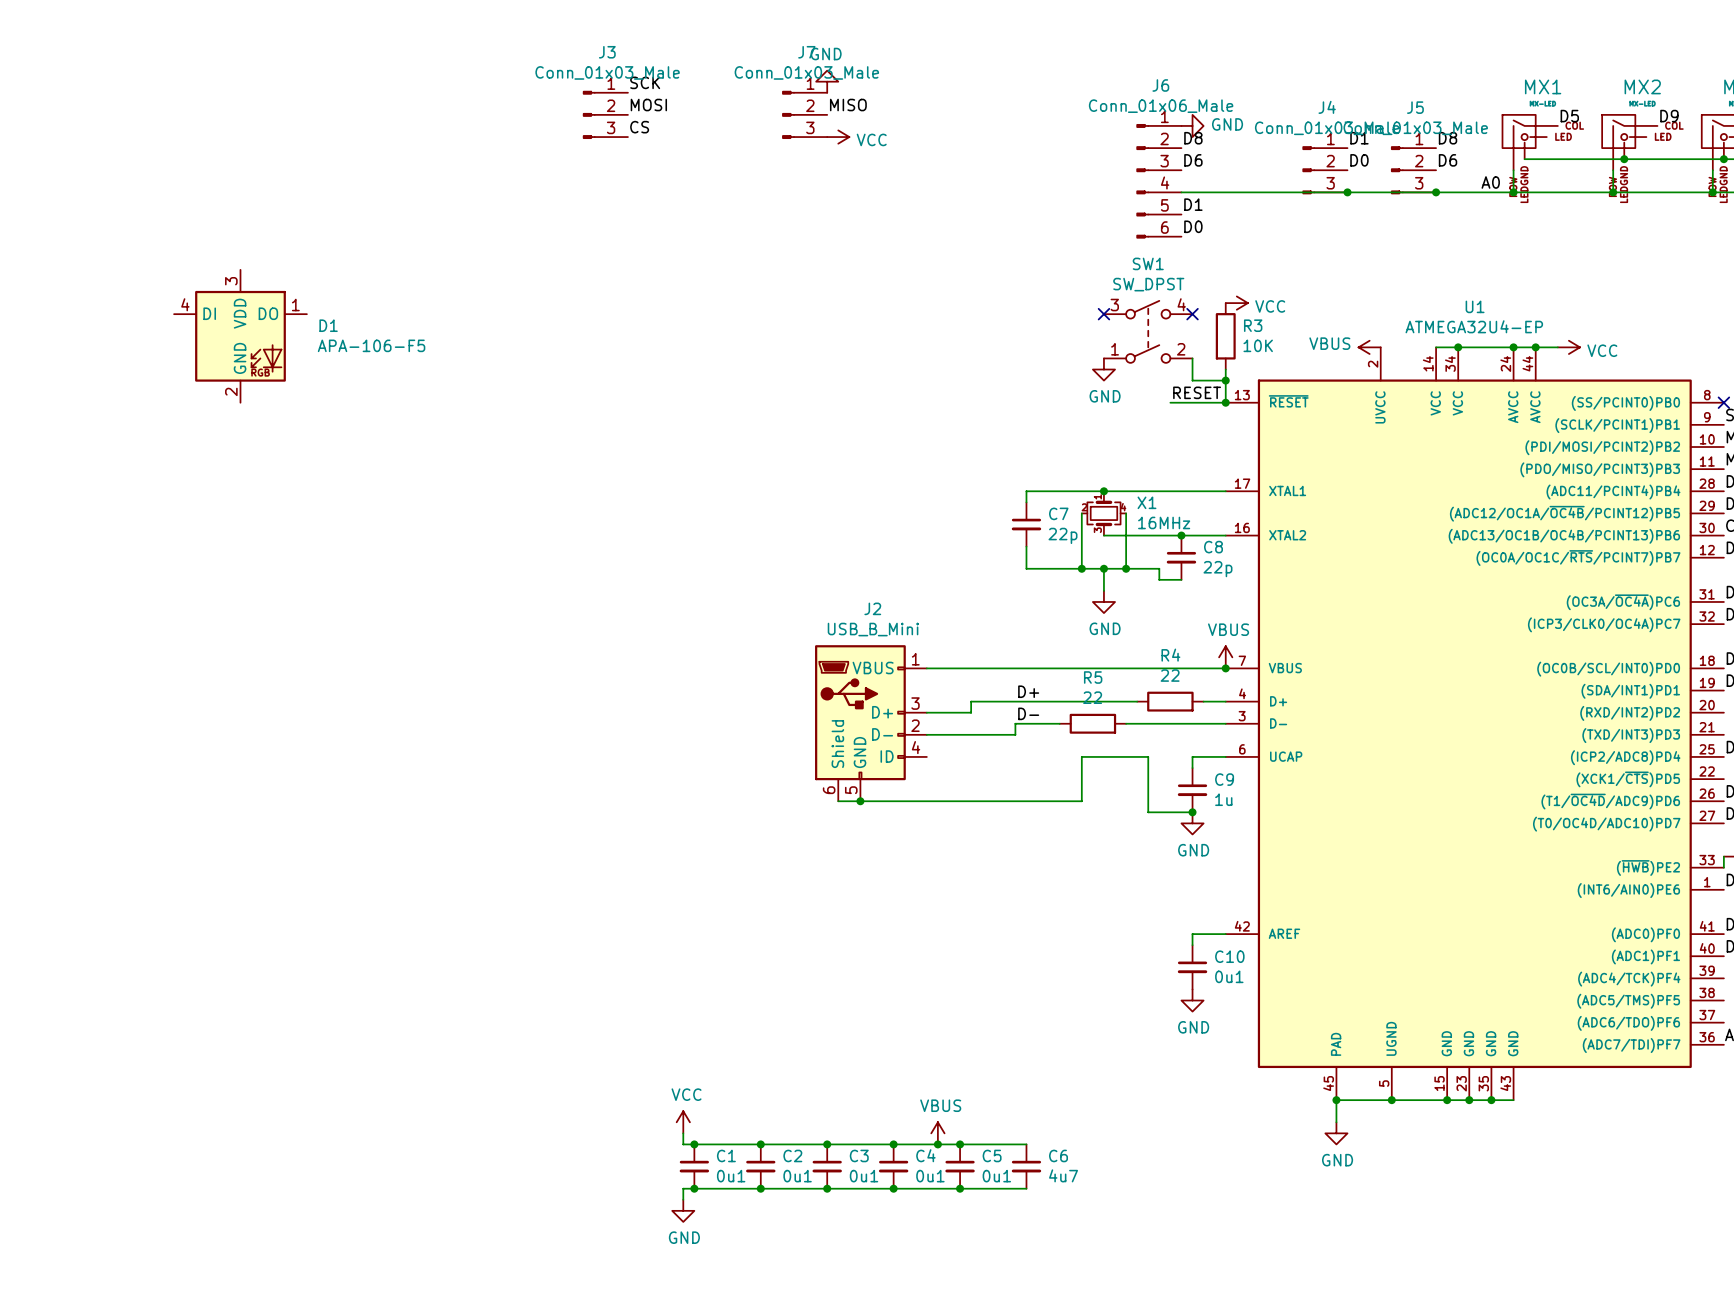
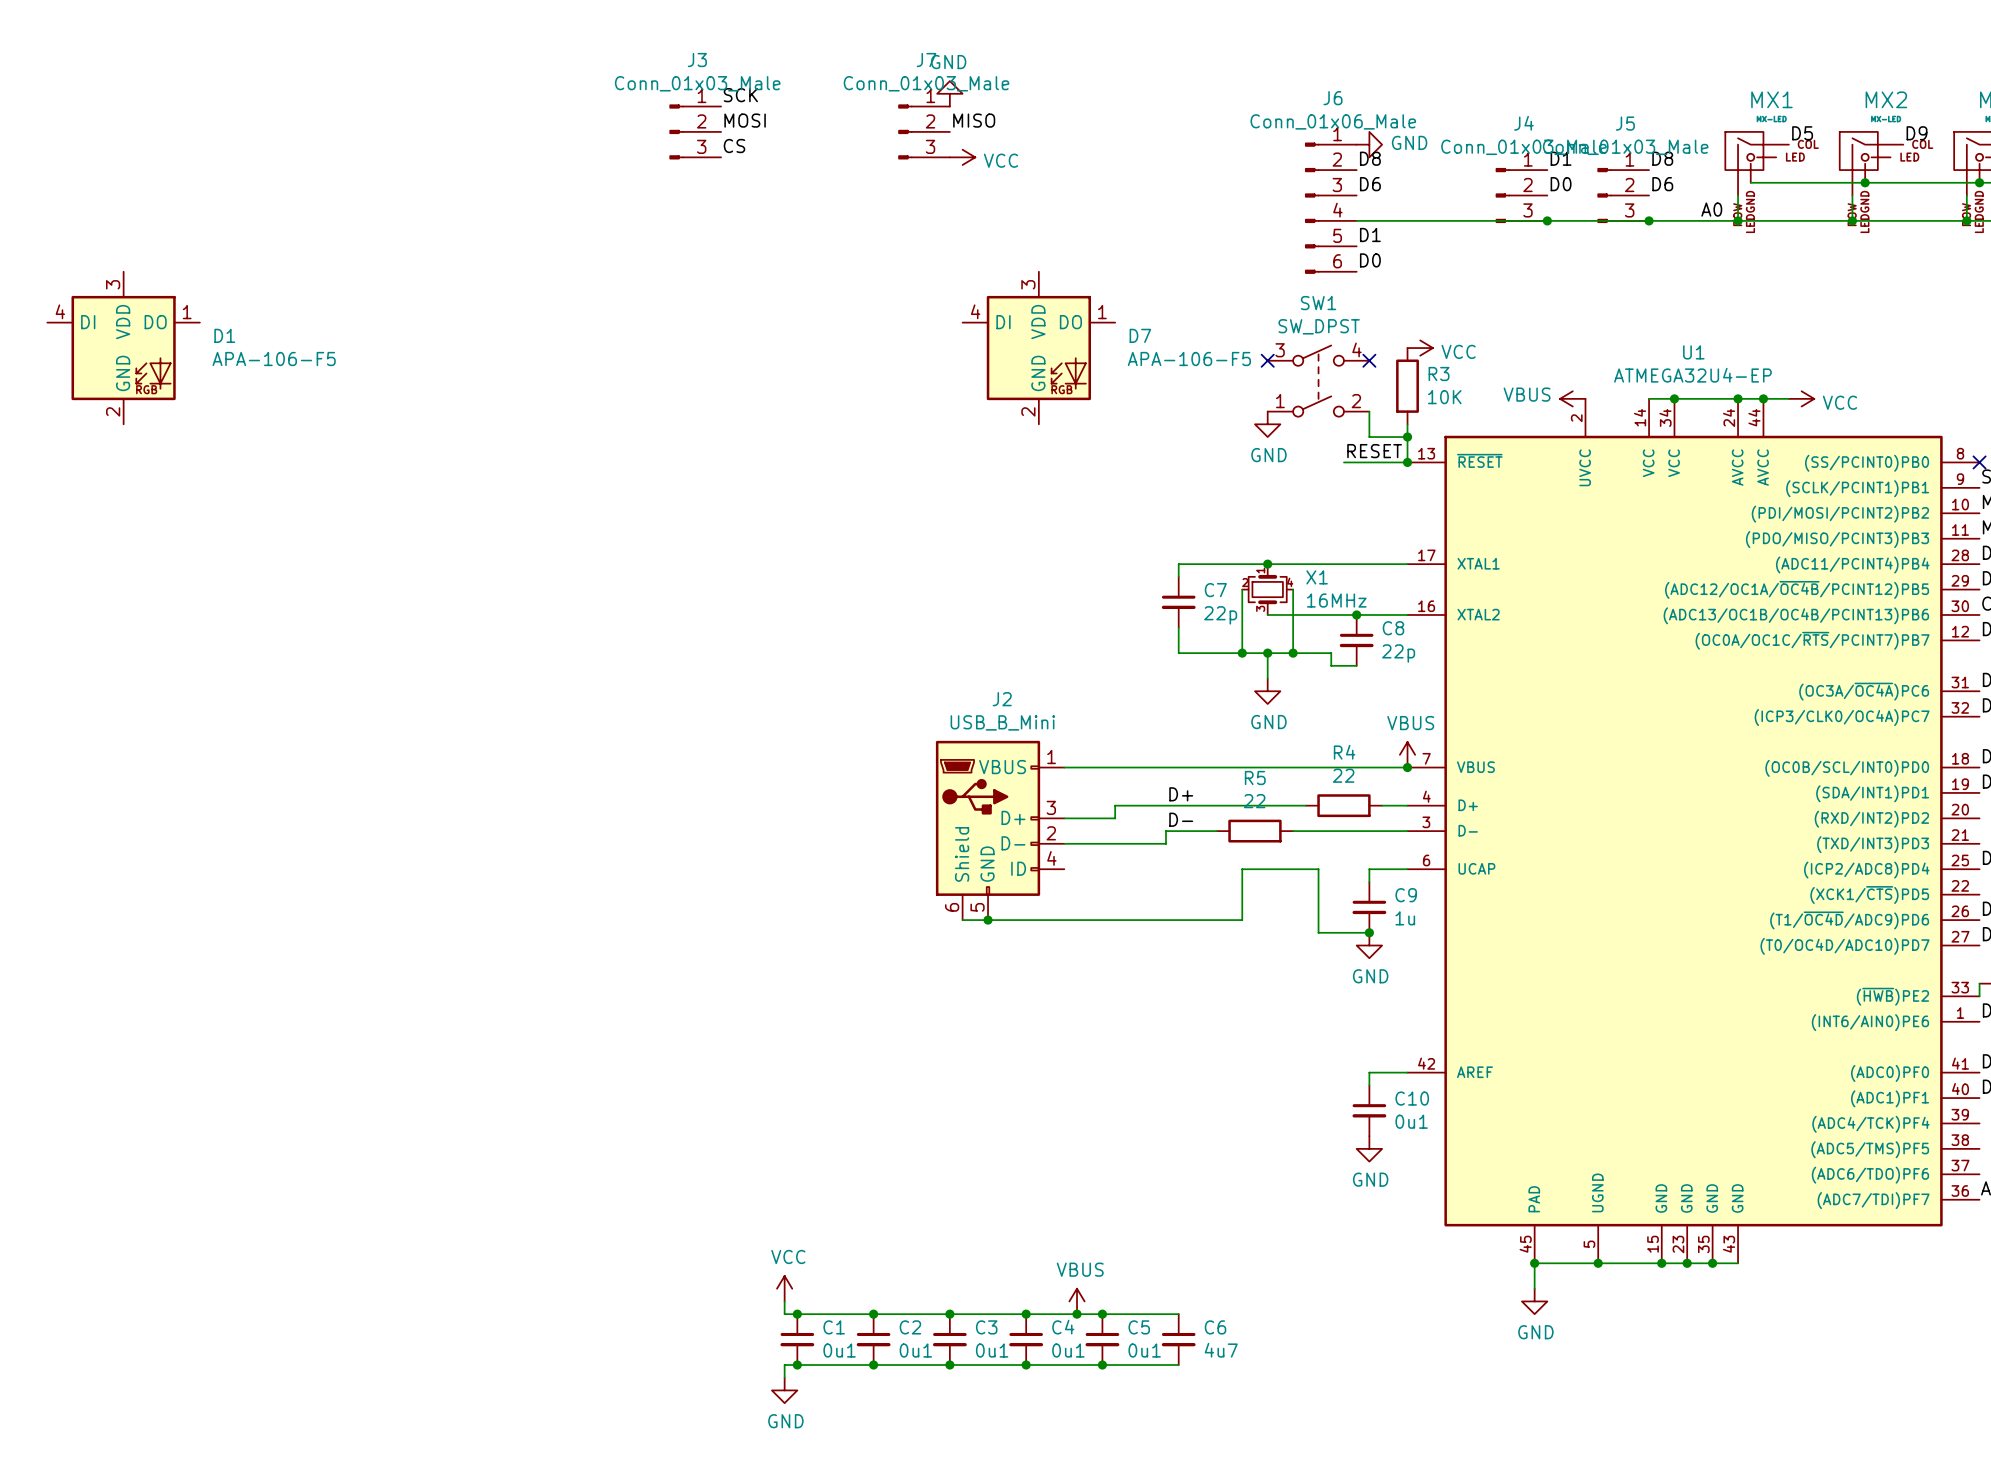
D7: none -> APA-106-F5 (1038, 348)
D1 position: (240, 336) -> (123, 348)

